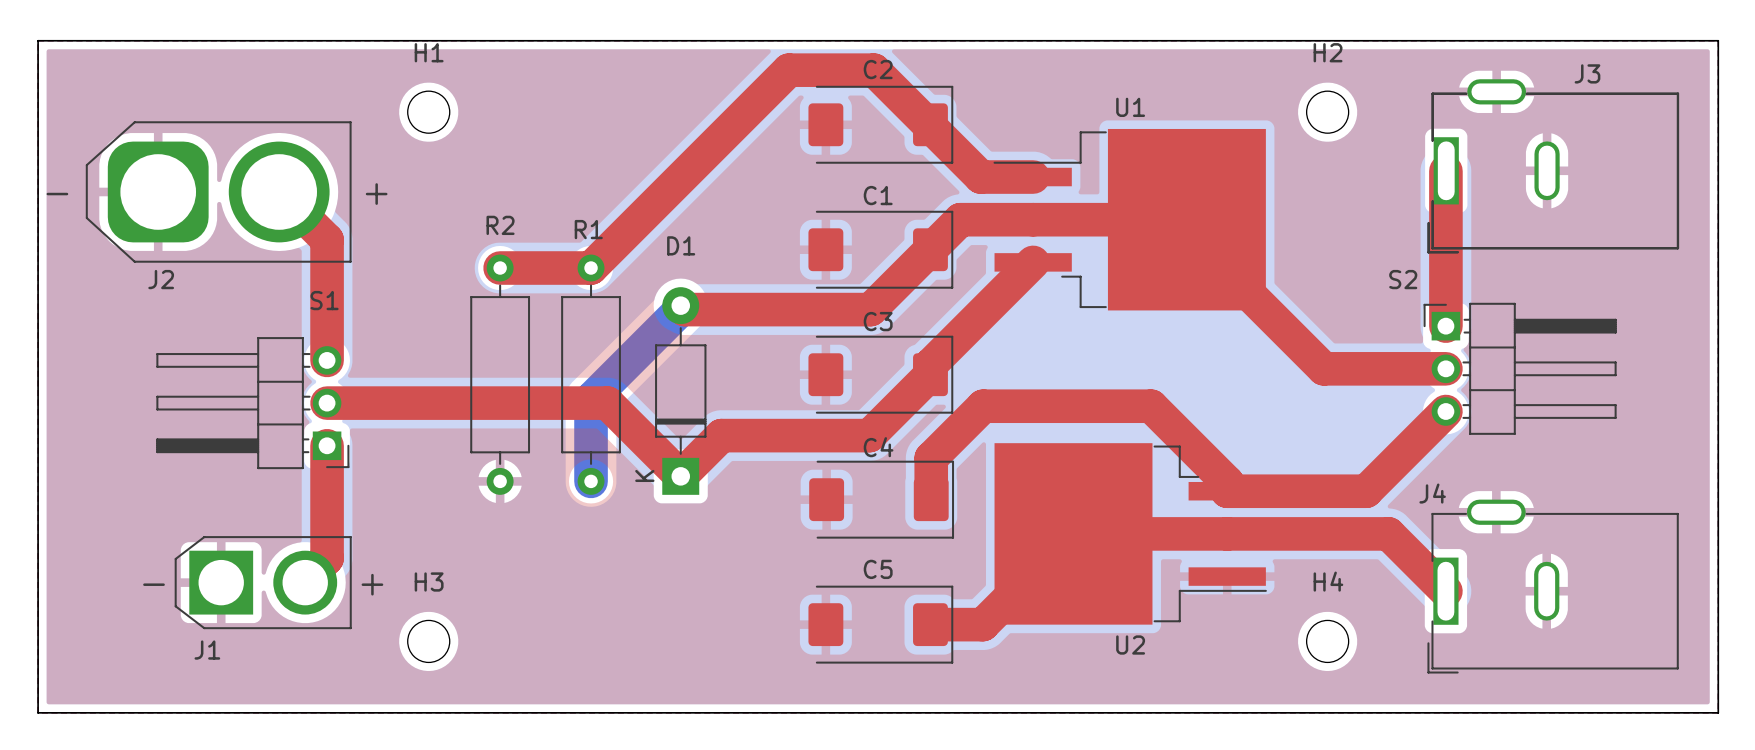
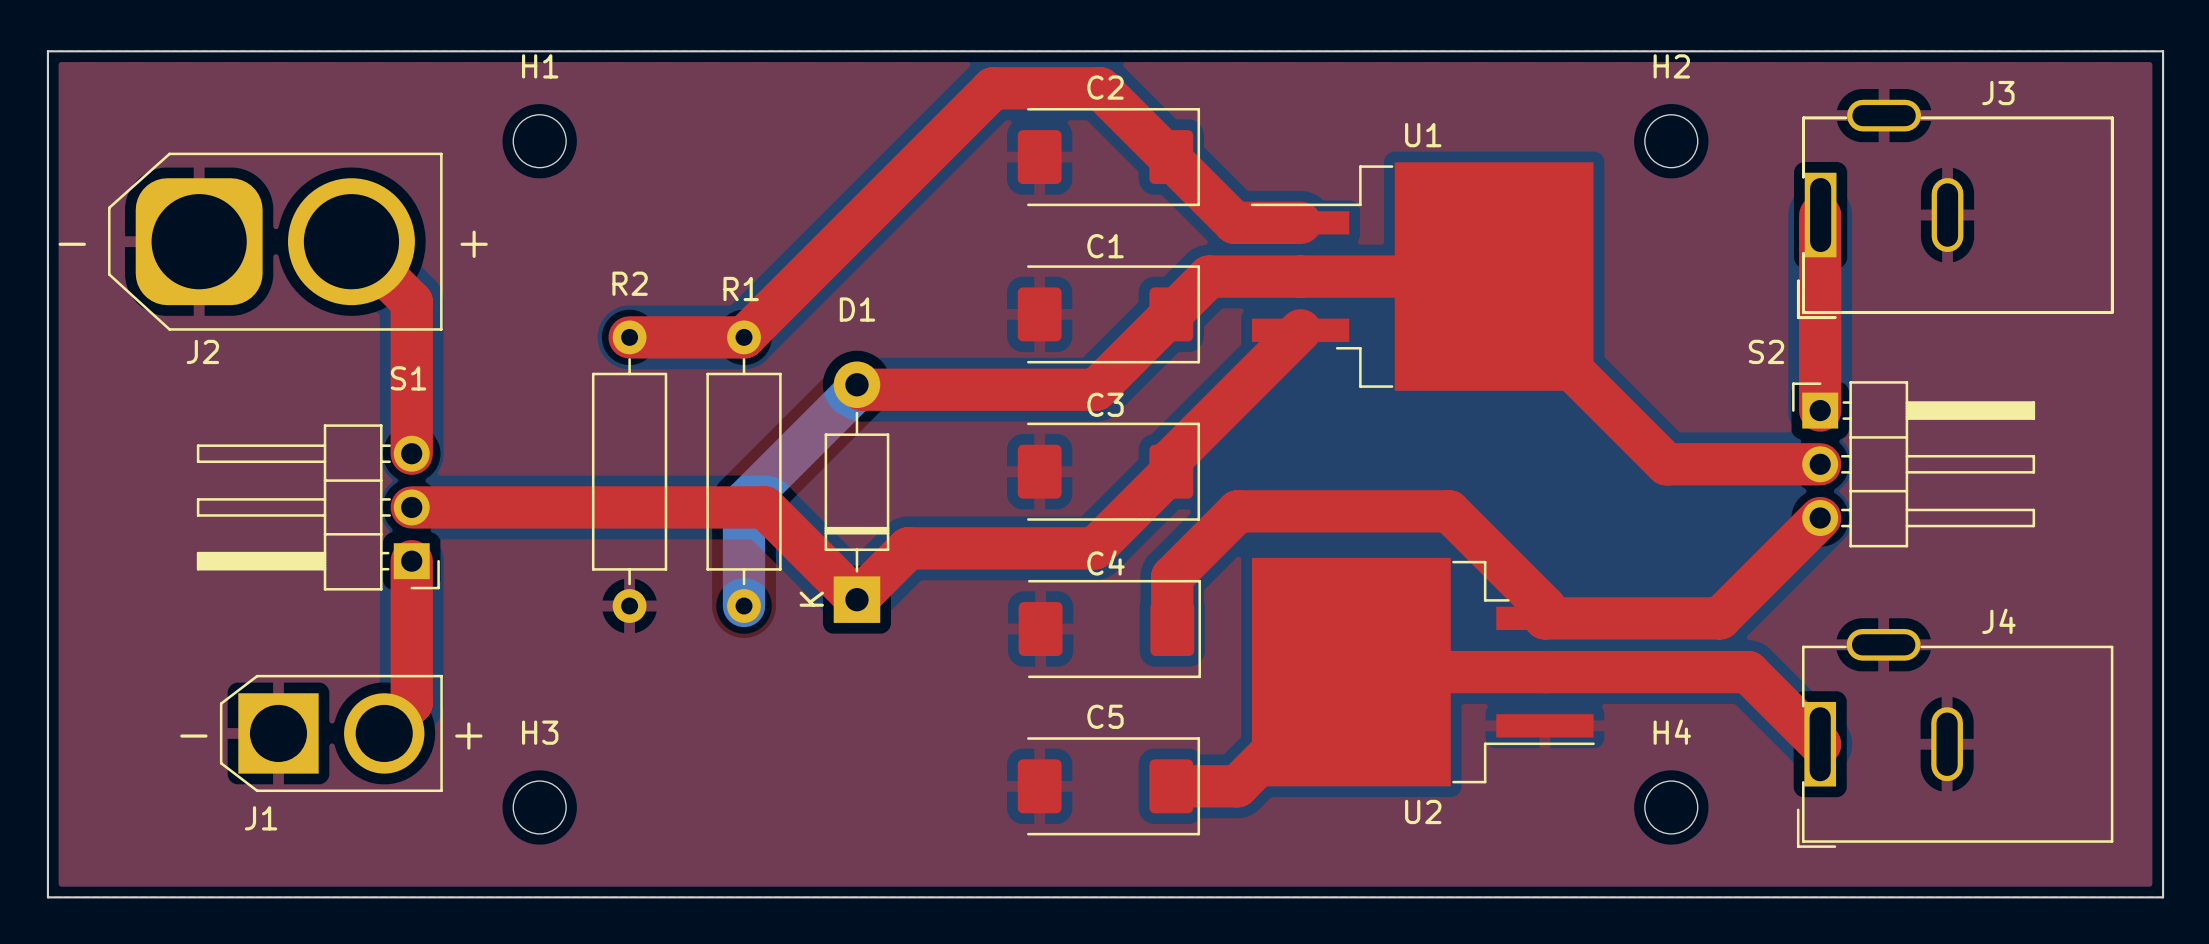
J4 name position: J4 (1432, 493) -> J4 (1998, 621)

